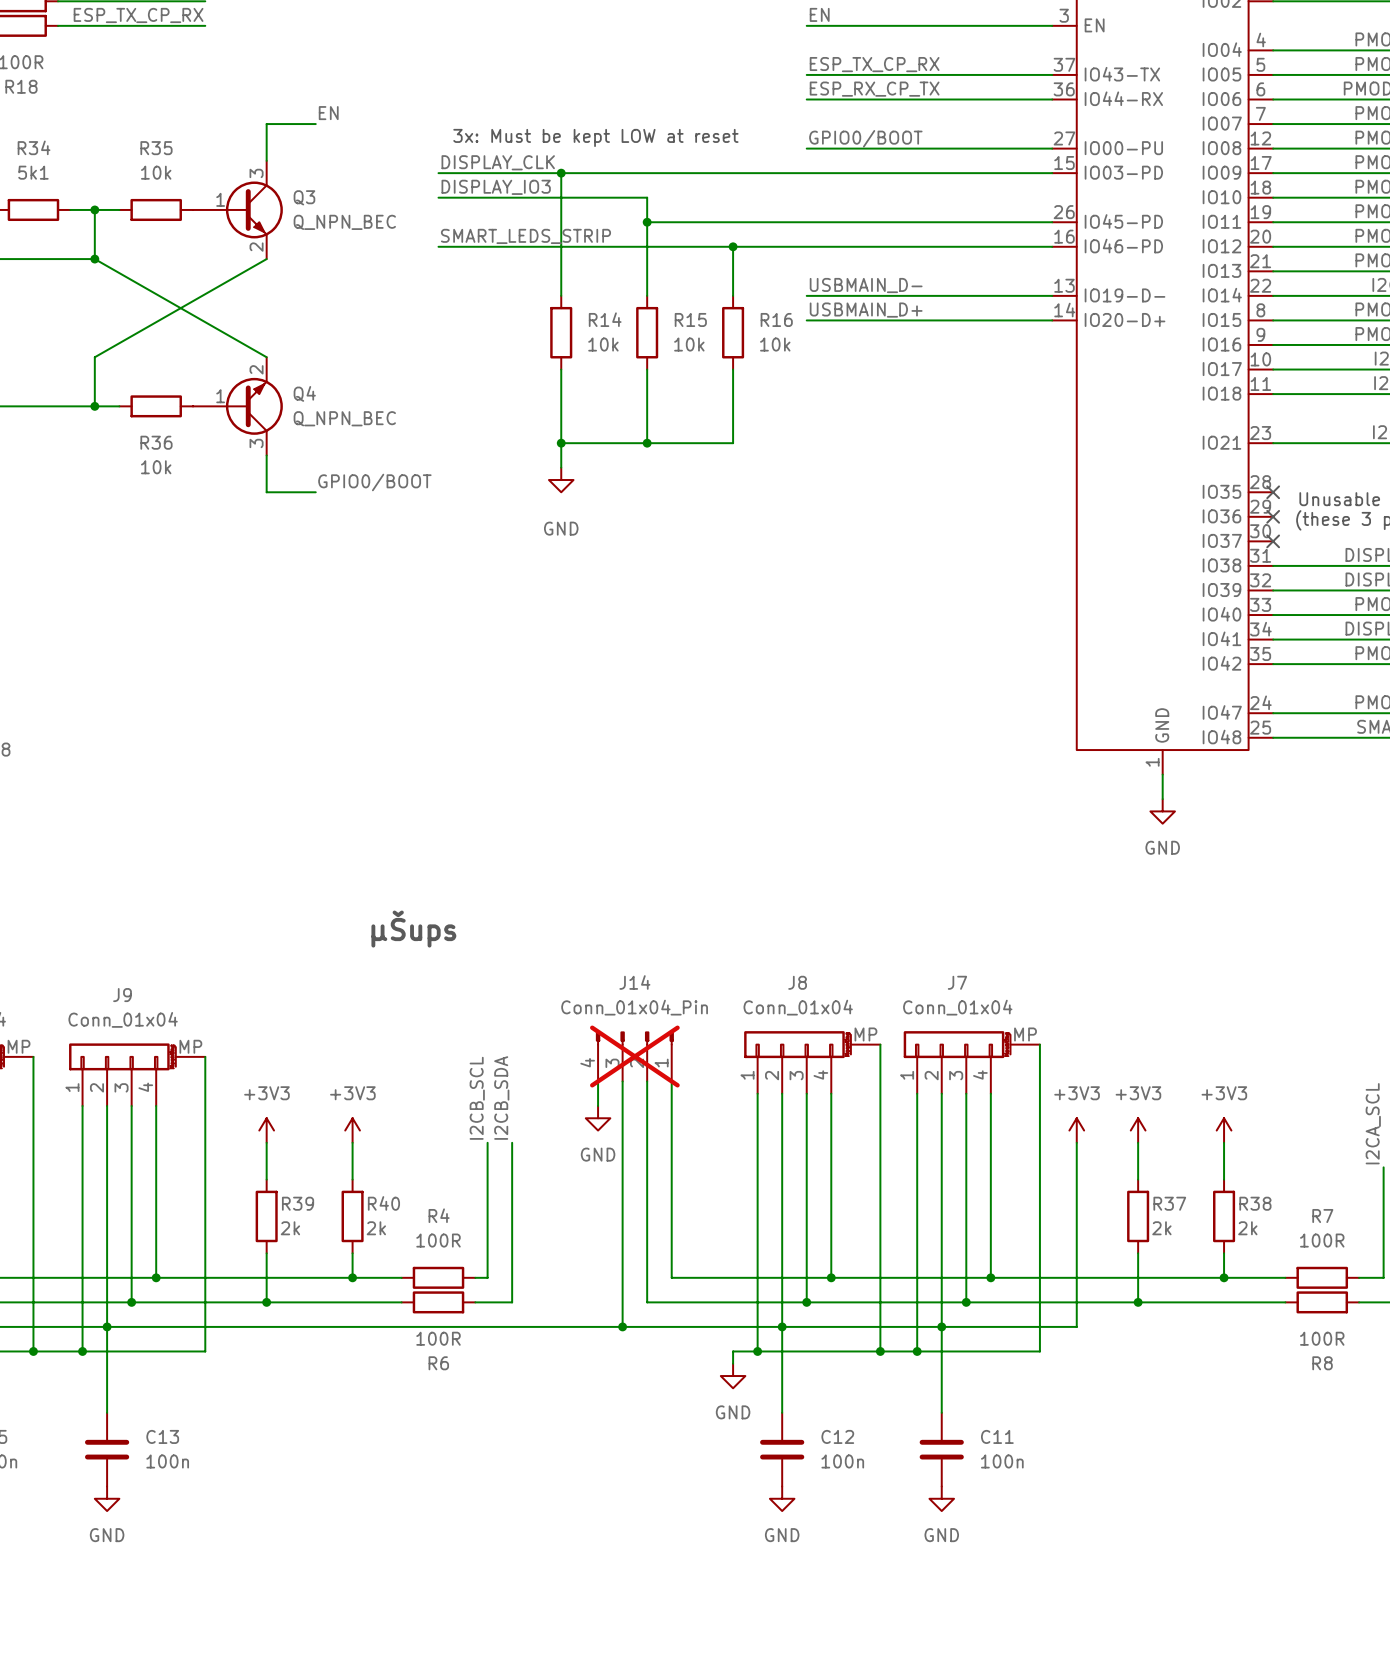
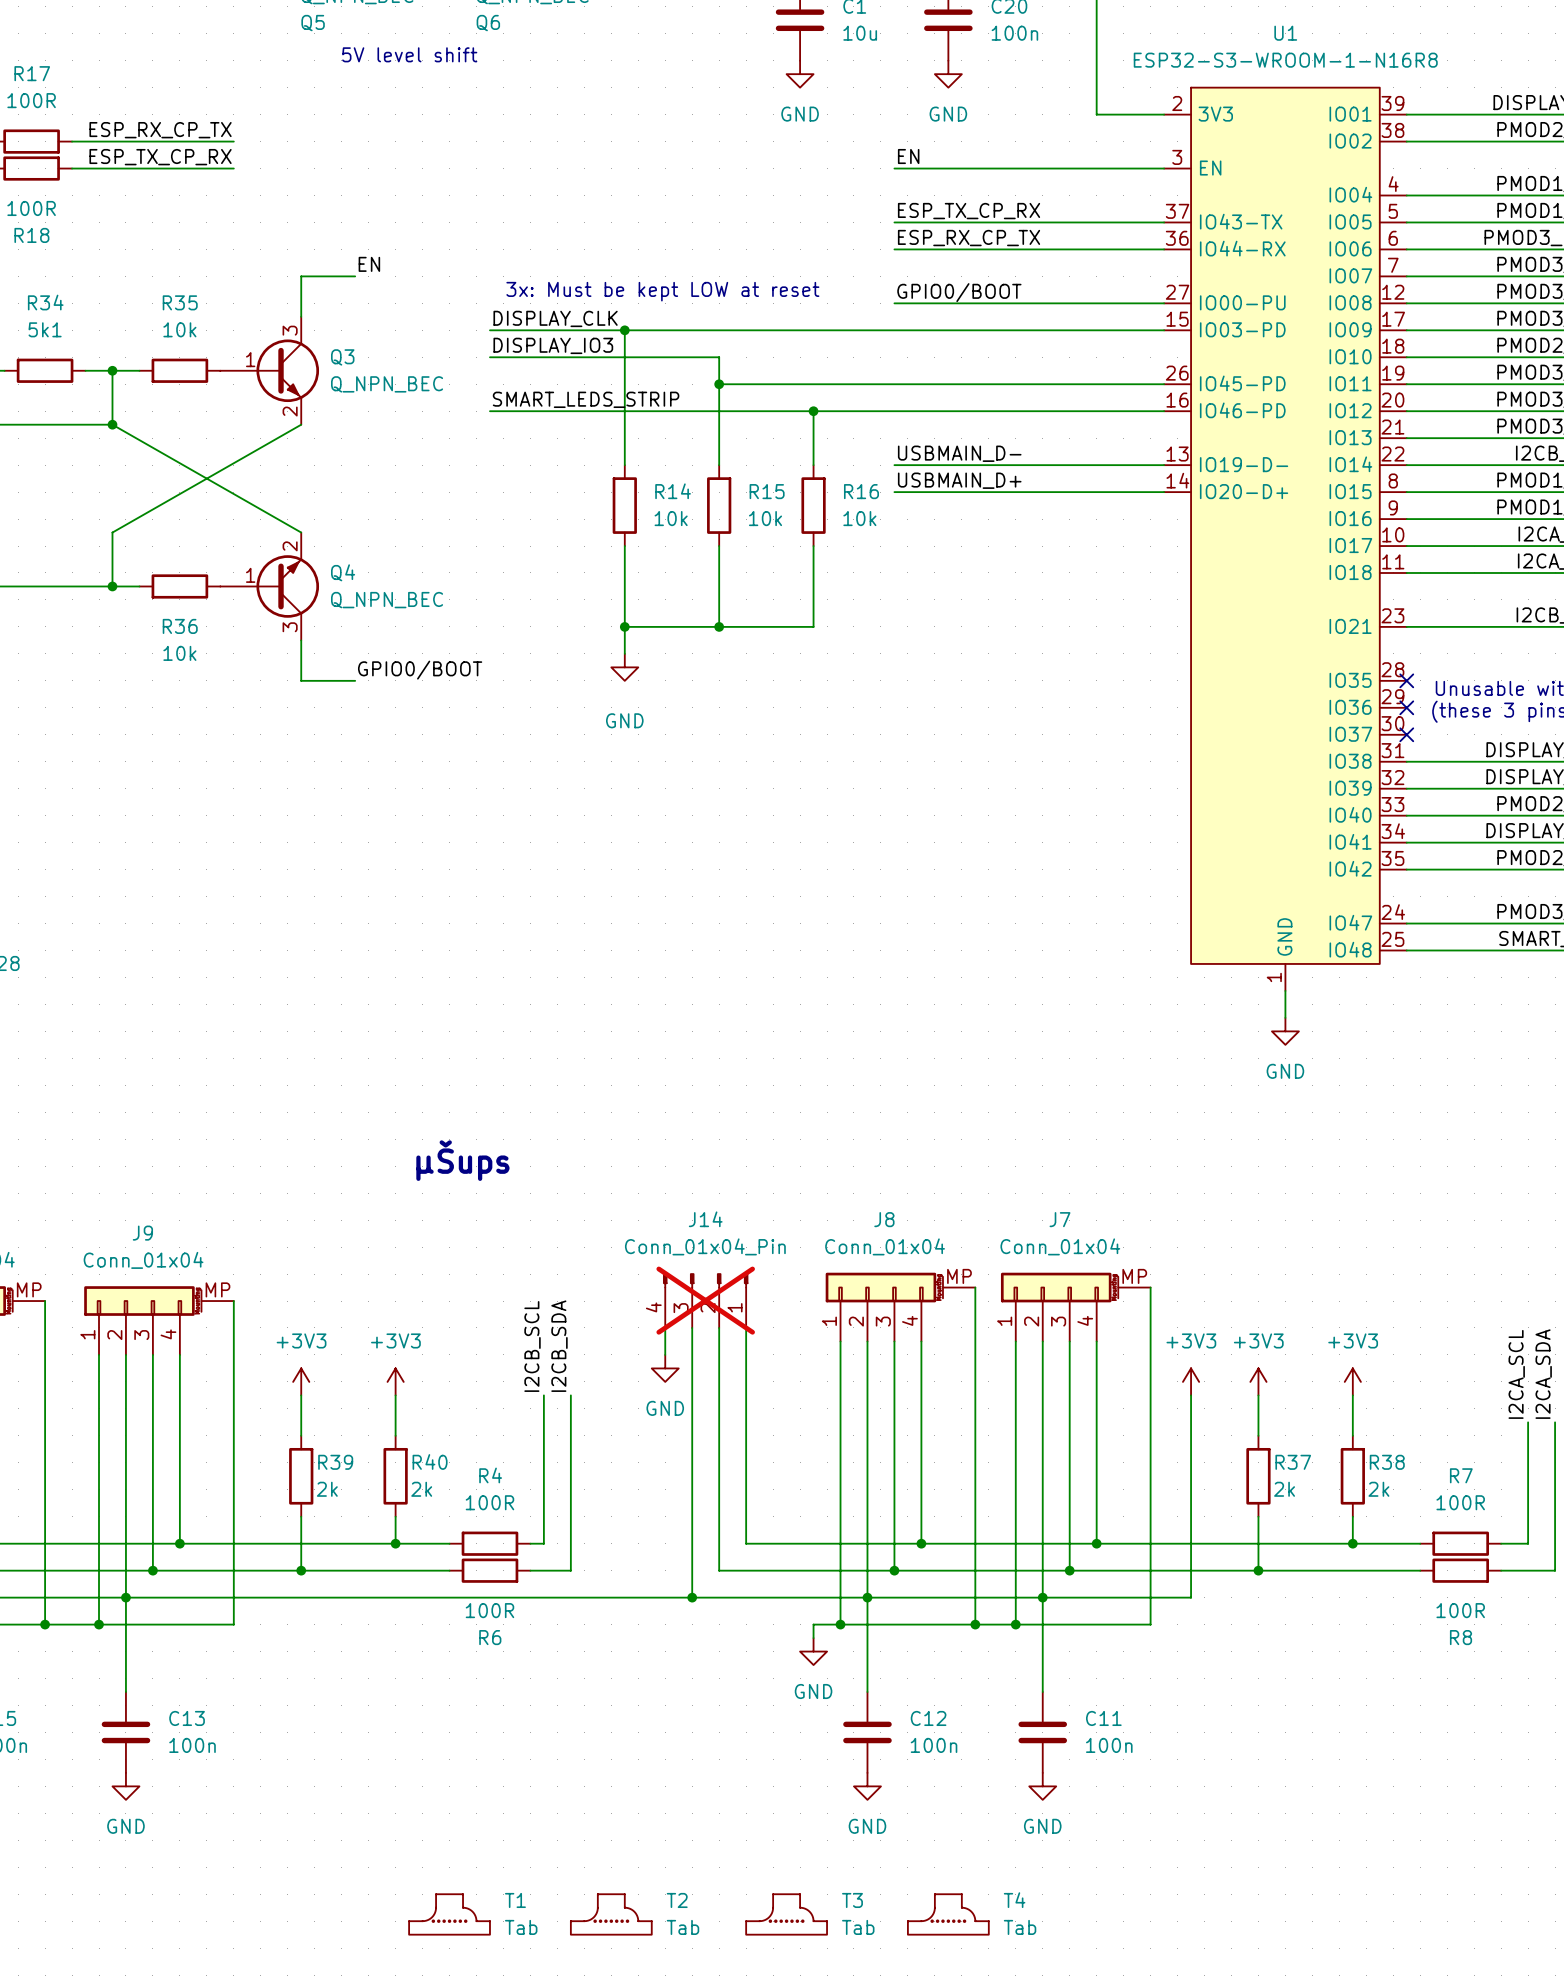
T1: none -> Tab (449, 1914)
T2: none -> Tab (611, 1914)
T3: none -> Tab (786, 1914)
T4: none -> Tab (948, 1914)

